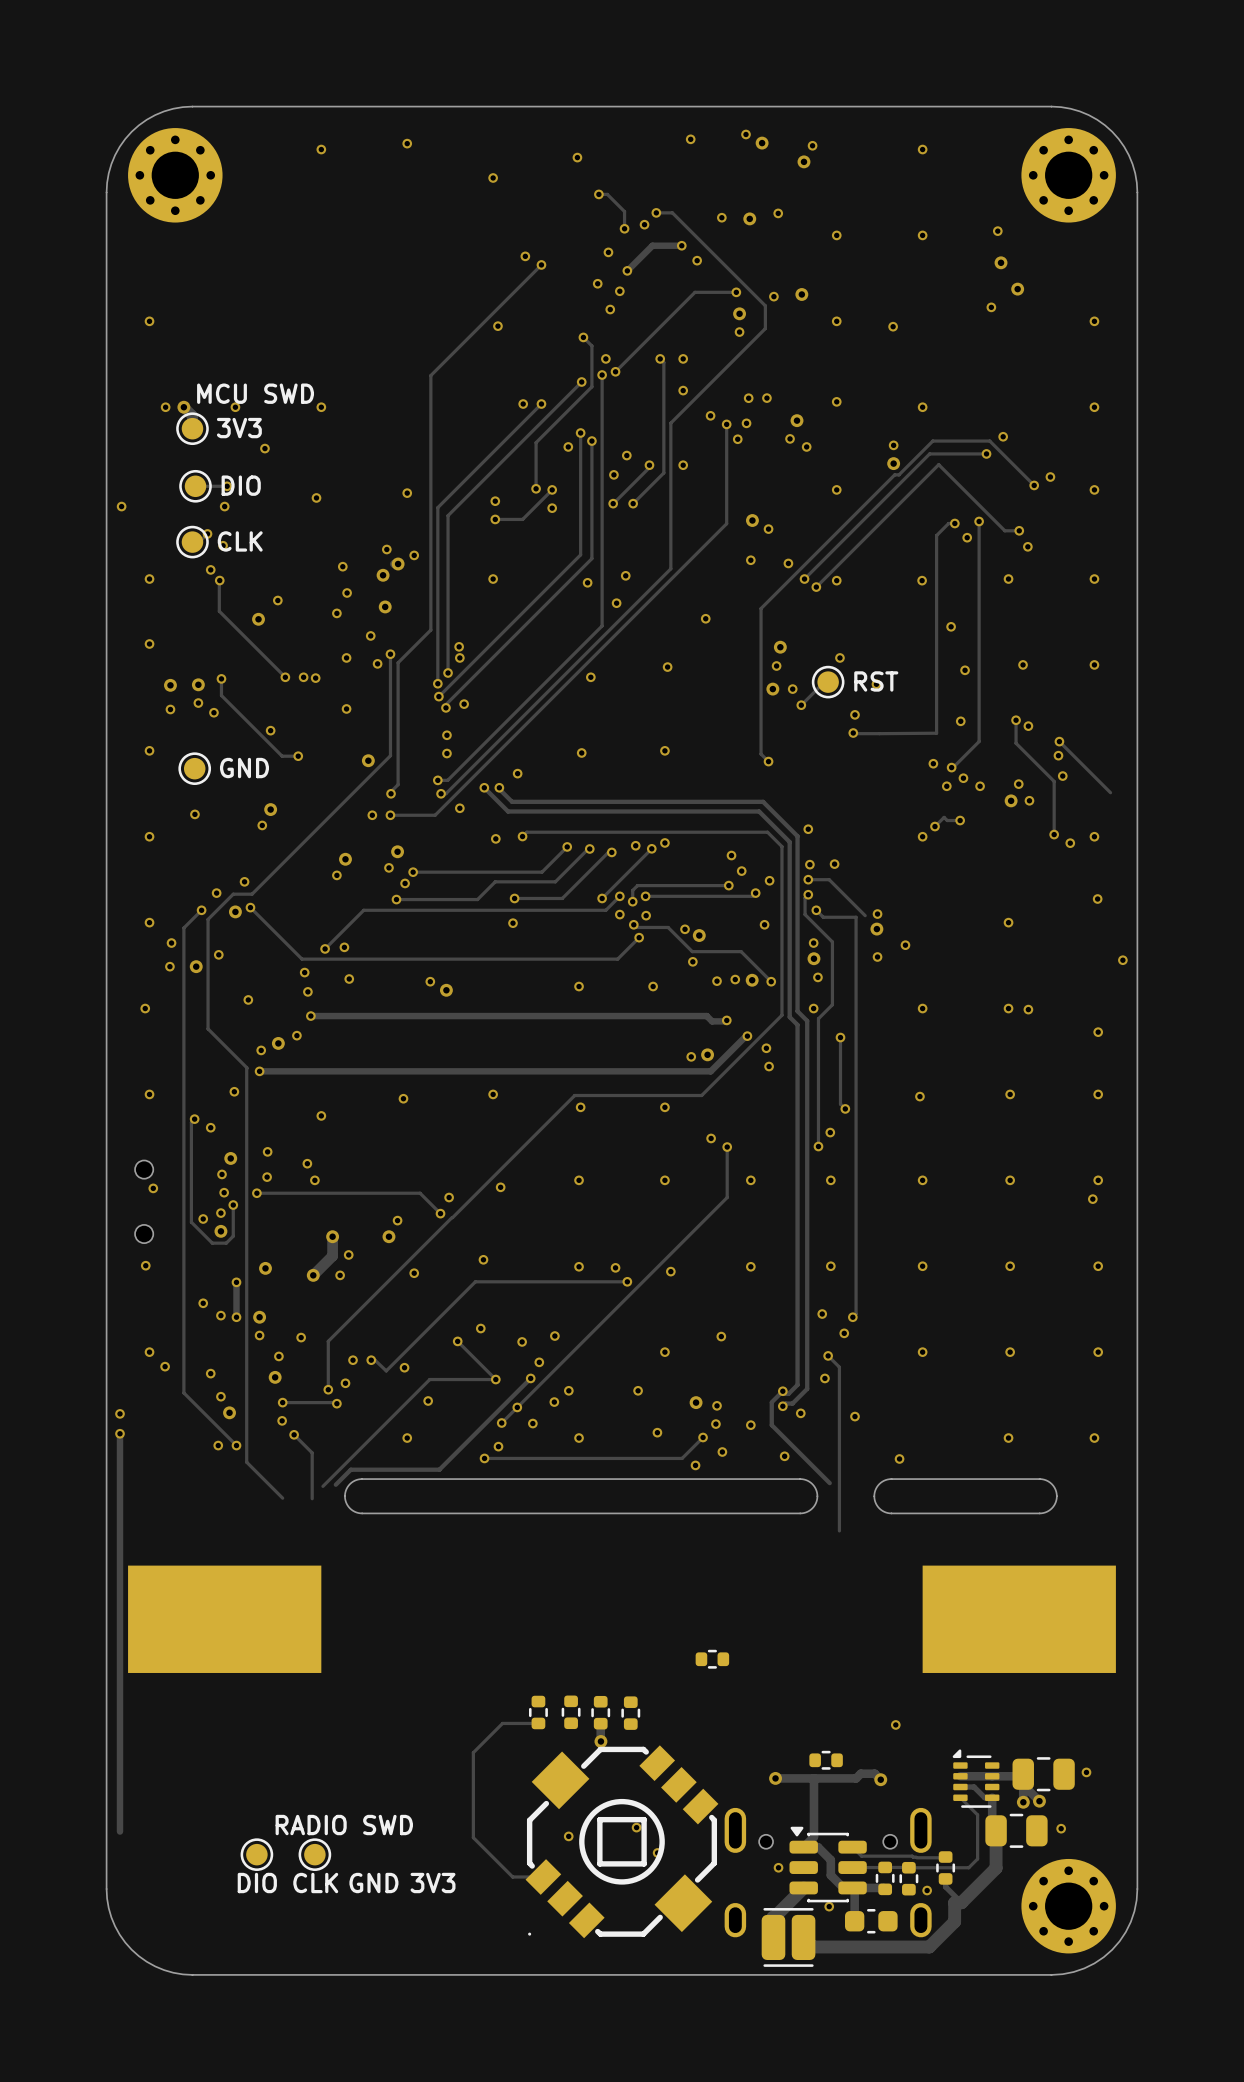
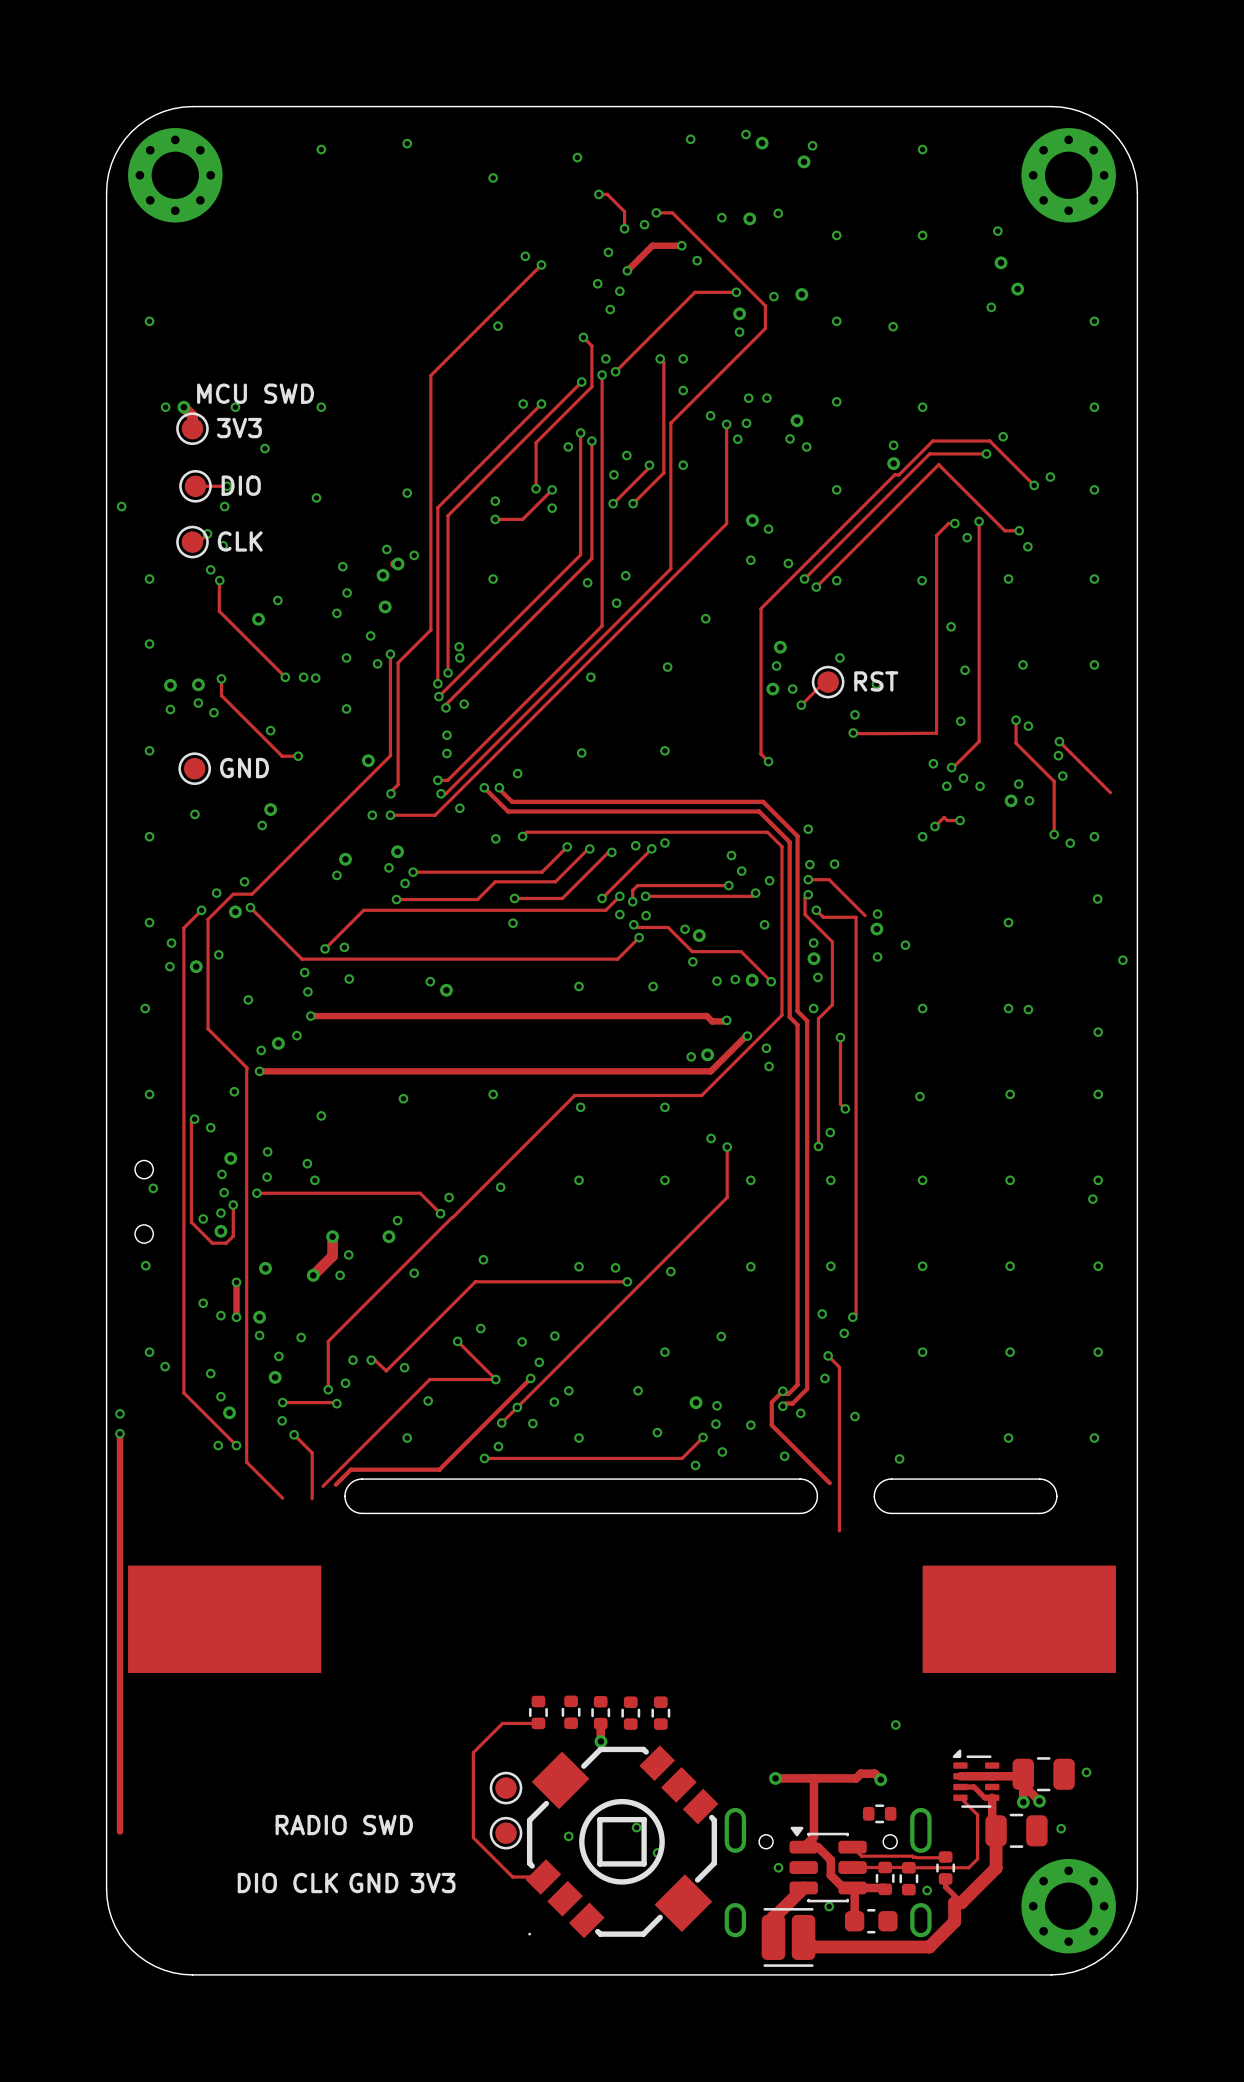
part rotation: 0° (712, 1659) -> 90° clockwise (660, 1713)
part position: (712, 1659) -> (660, 1713)
part position: (826, 1760) -> (879, 1813)
part: none -> (506, 1788)
part: none -> (506, 1833)
part: (256, 1854) -> none
part: (314, 1854) -> none

